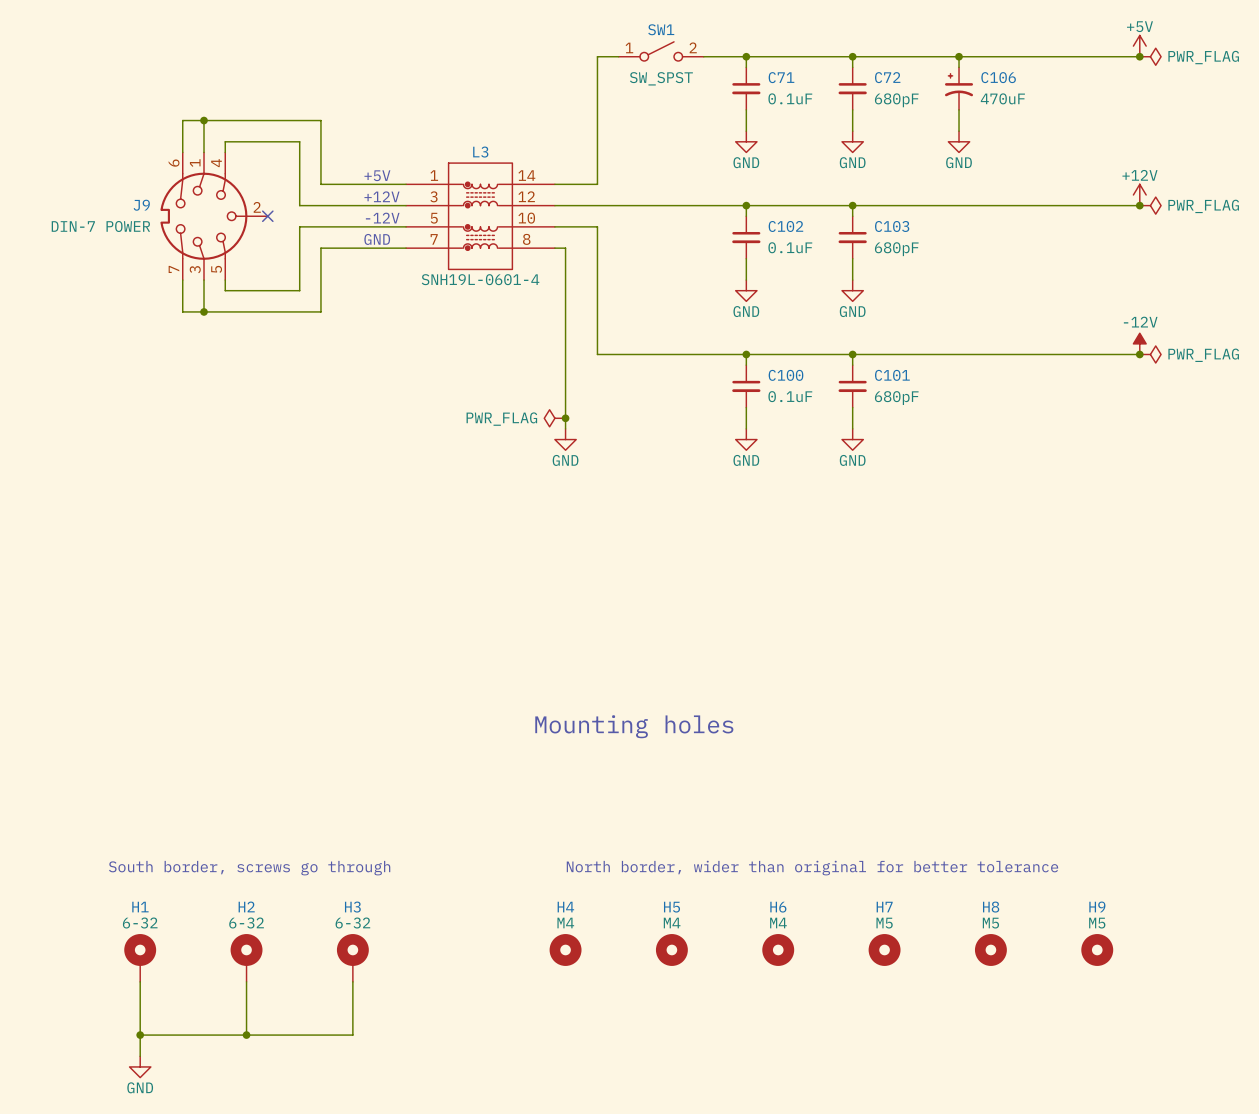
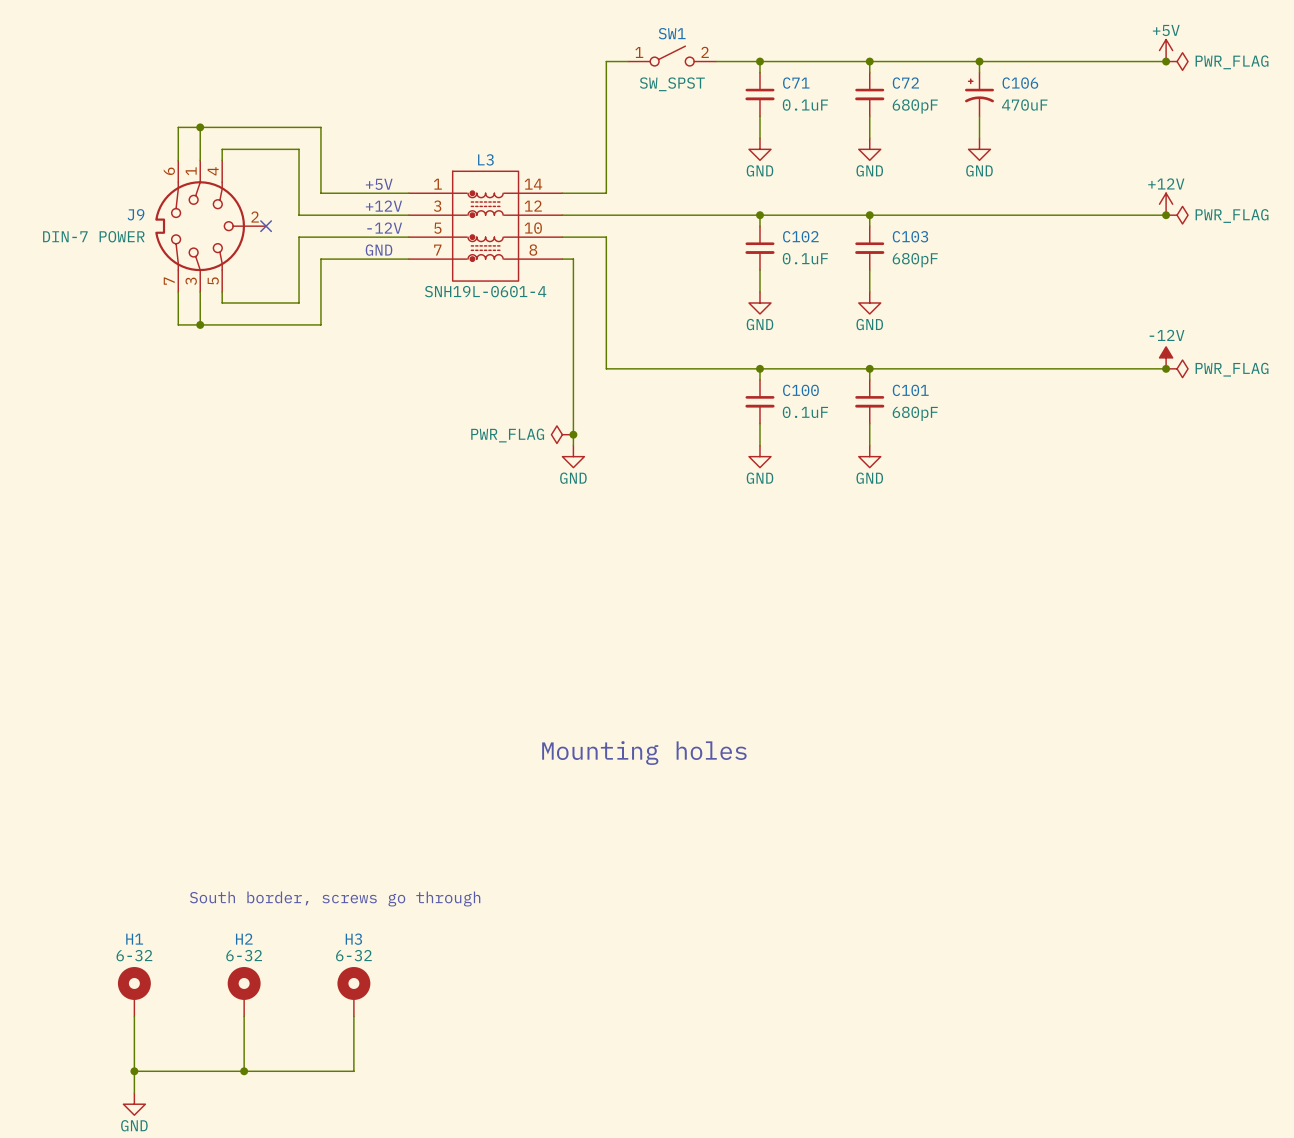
text position: South border, screws go through (249, 868) -> South border, screws go through (335, 899)
text: North border, wider than original for better tolerance (812, 868) -> none
H4: M4 (565, 949) -> none
H5: M4 (671, 949) -> none
H6: M4 (778, 949) -> none
H7: M5 (884, 949) -> none
H8: M5 (990, 949) -> none
H9: M5 (1097, 949) -> none

